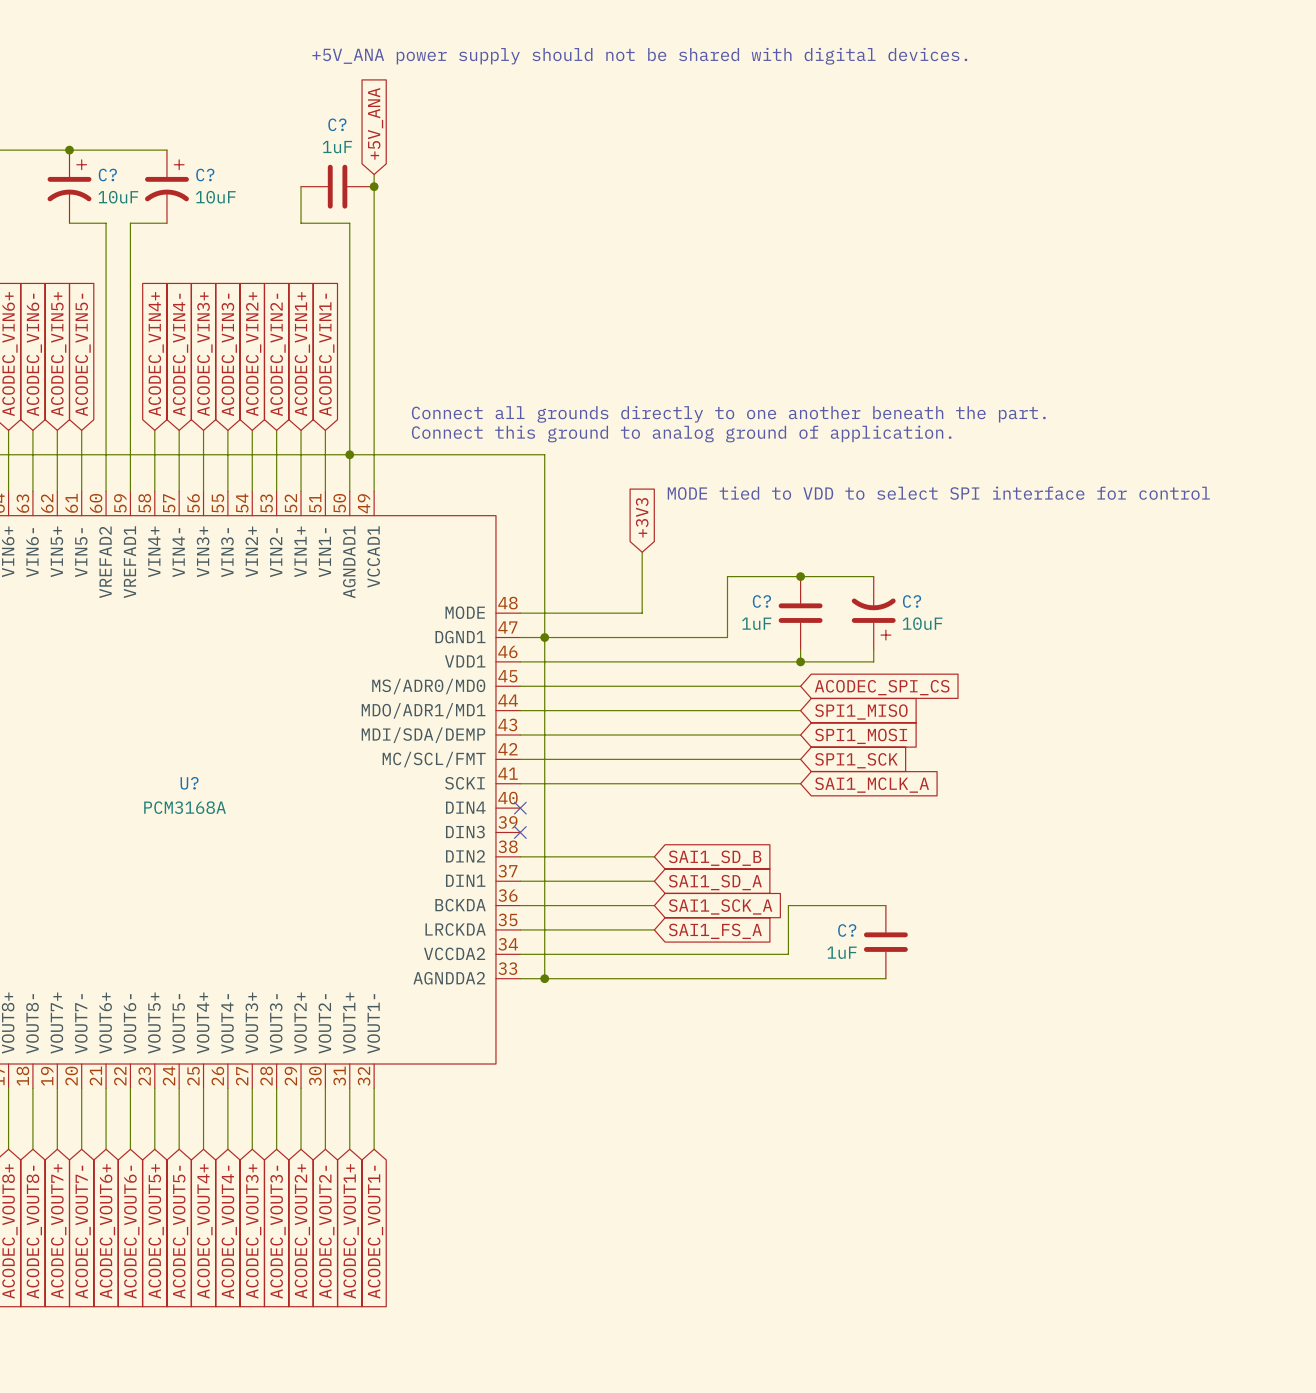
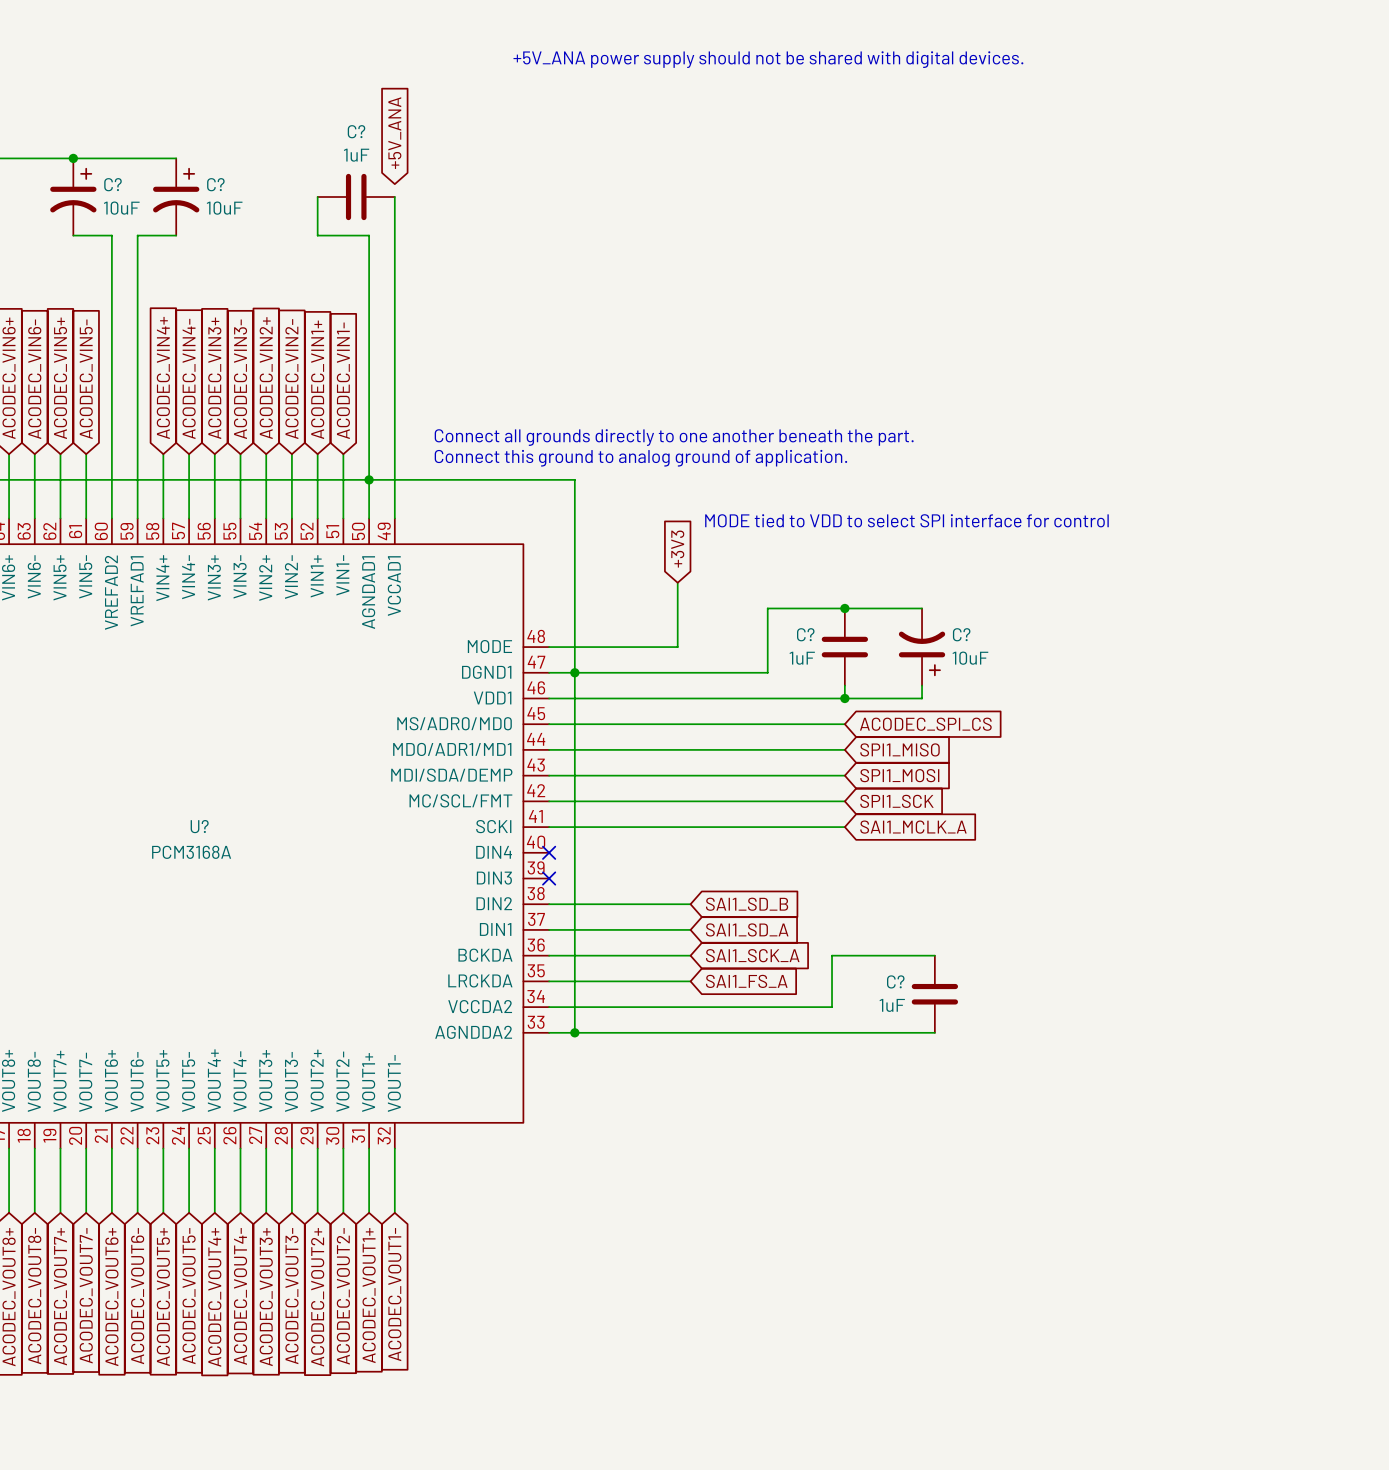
wire: (374, 174) (374, 186) -> none
junction: (374, 186) -> none

